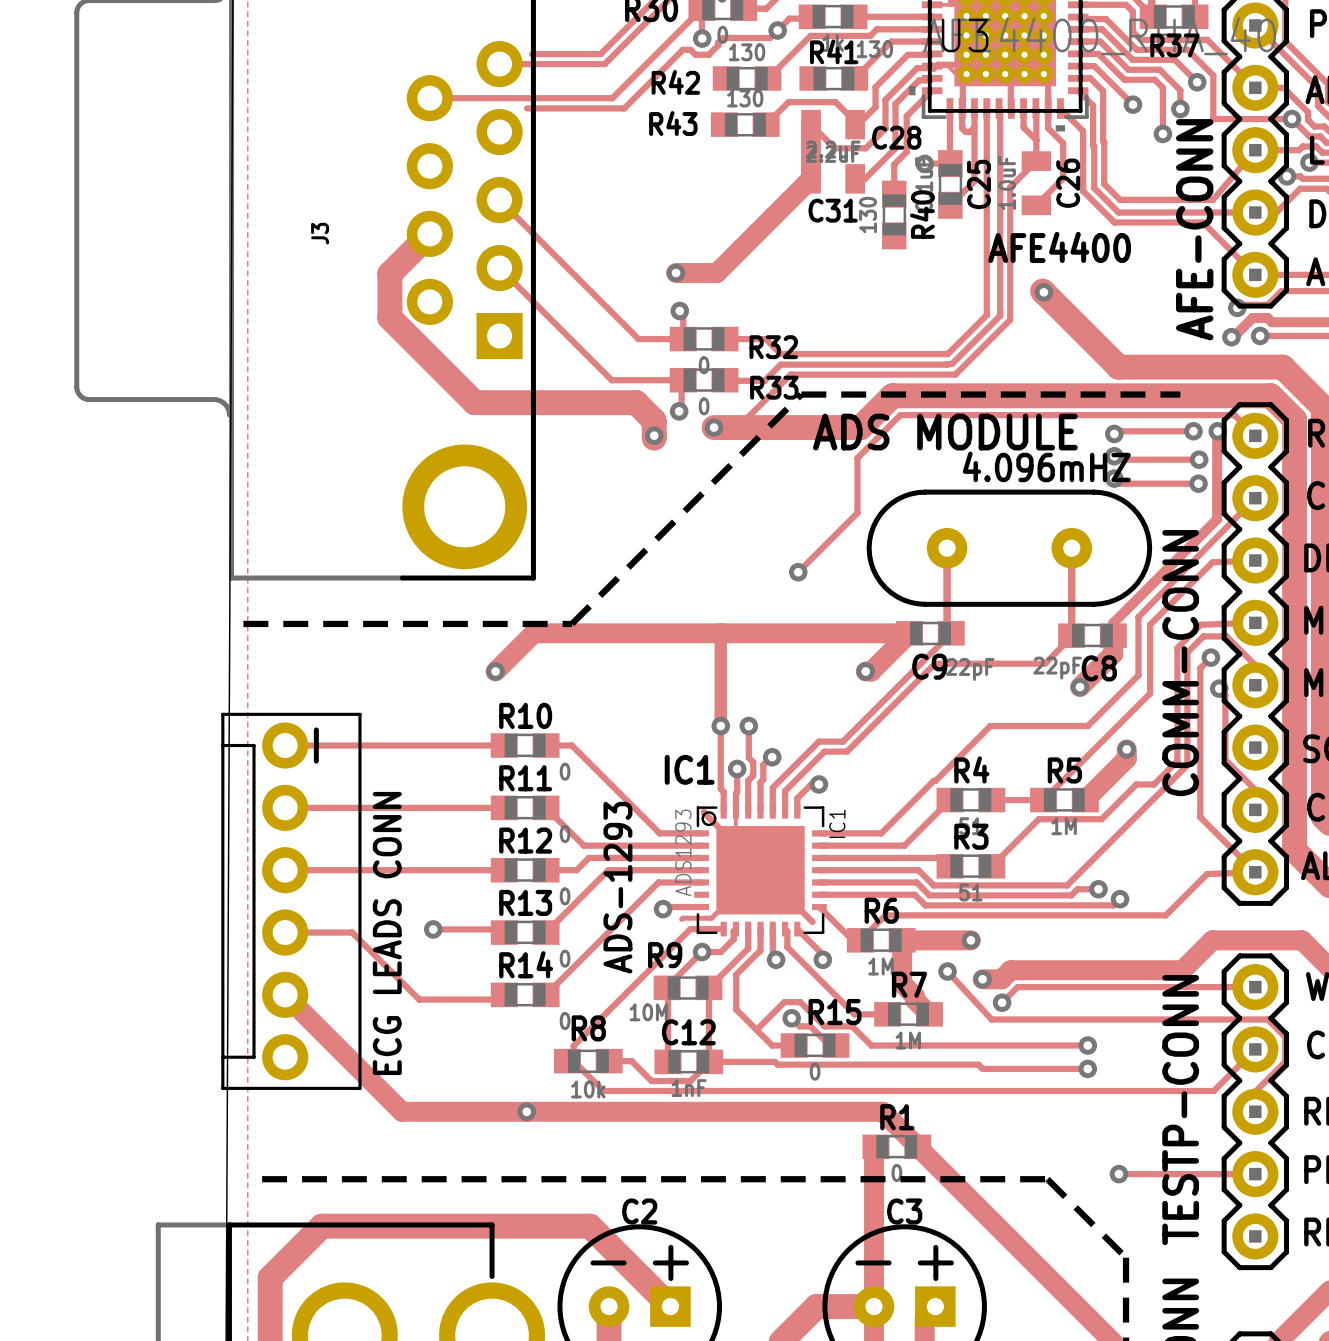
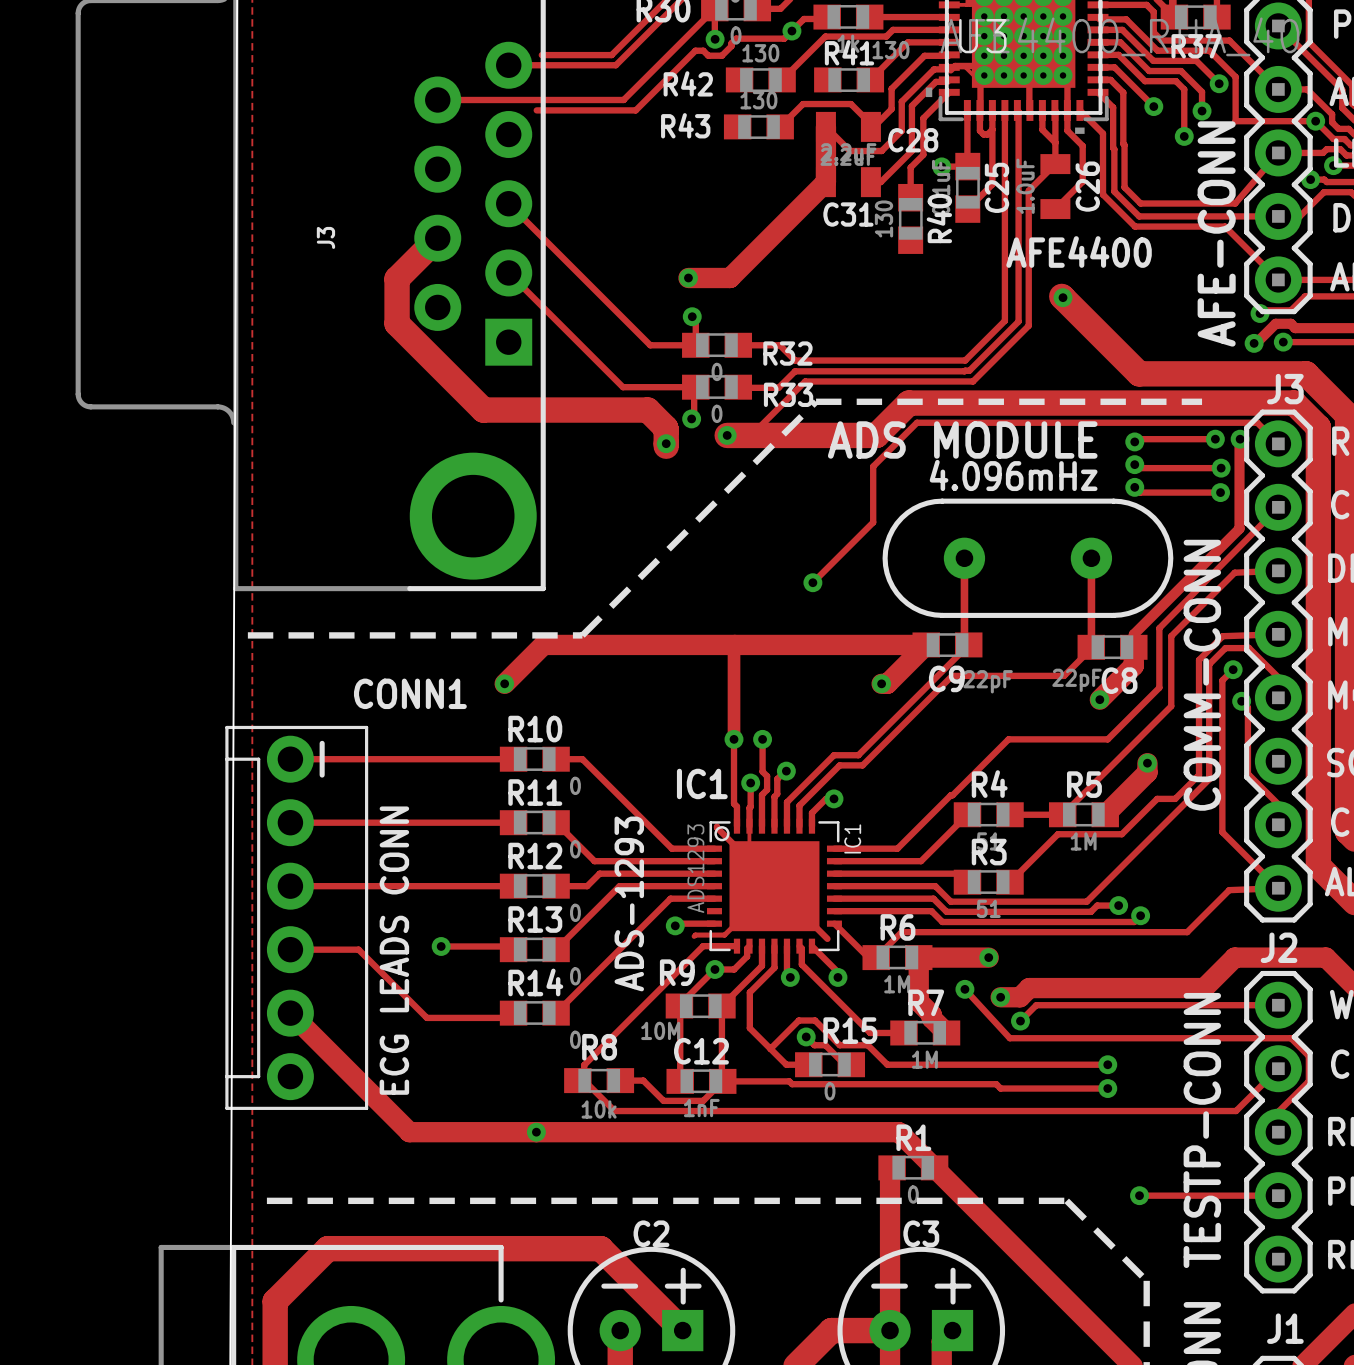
text: none -> J3 (1285, 389)
text: 4.096mHZ (1046, 466) -> 4.096mHz (1013, 475)
text: none -> CONN1 (410, 693)
text: none -> J2 (1279, 947)
text: none -> J1 (1285, 1328)

